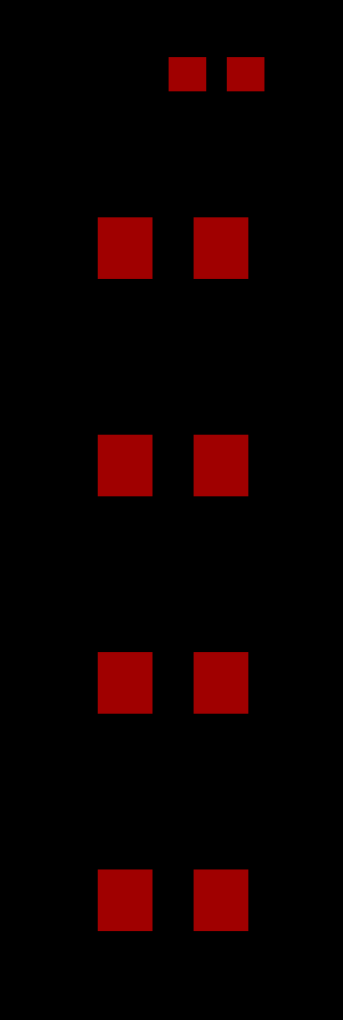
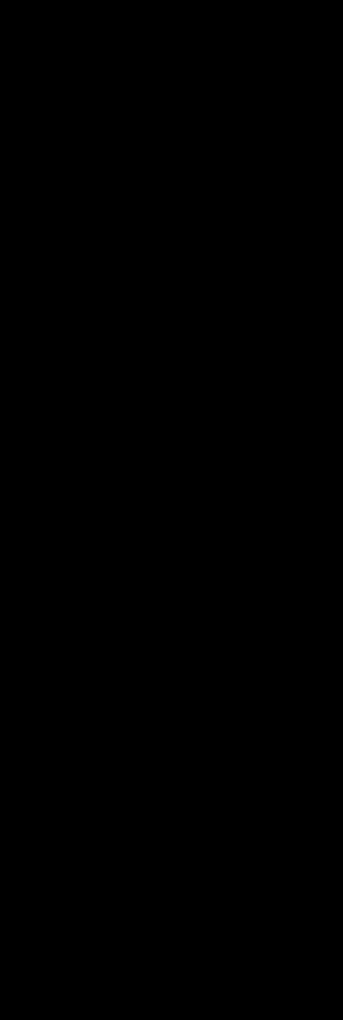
part: (216, 74) -> none
part: (173, 248) -> none
part: (173, 465) -> none
part: (173, 682) -> none
part: (173, 900) -> none

